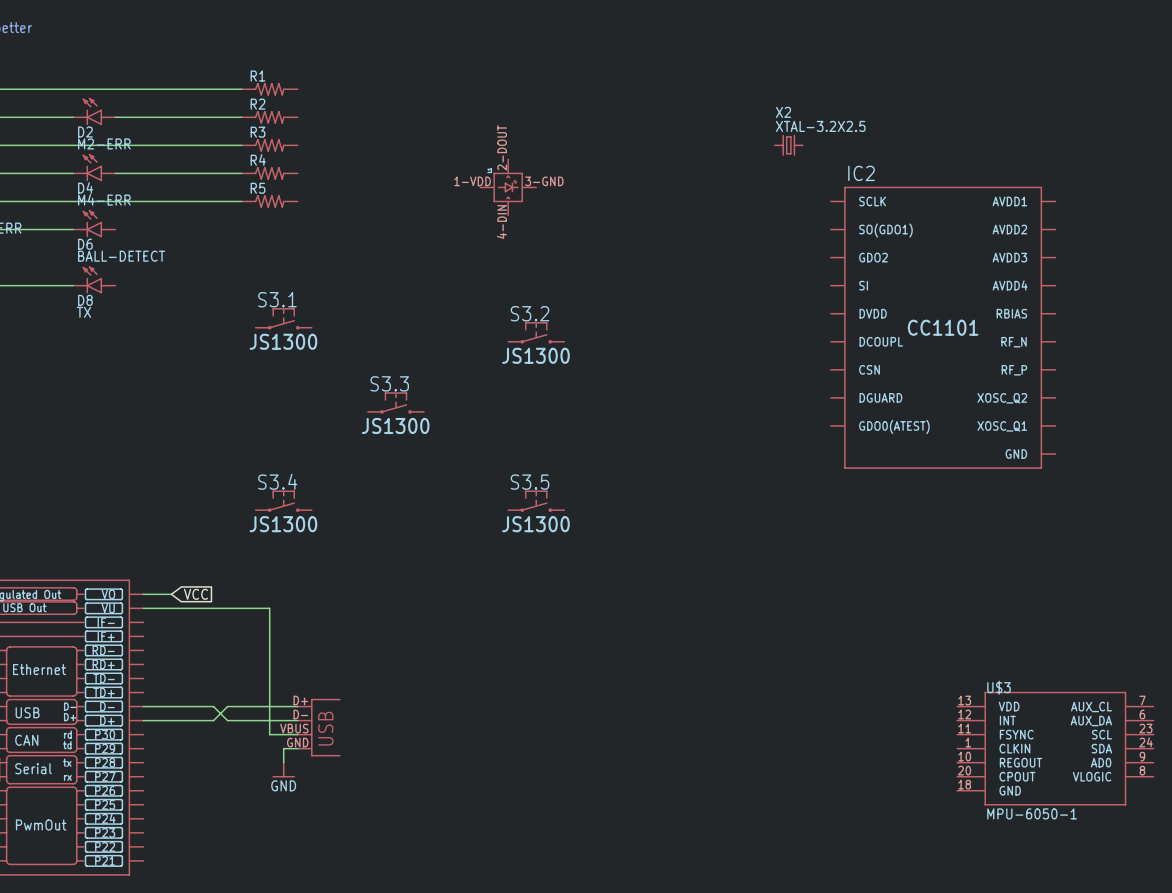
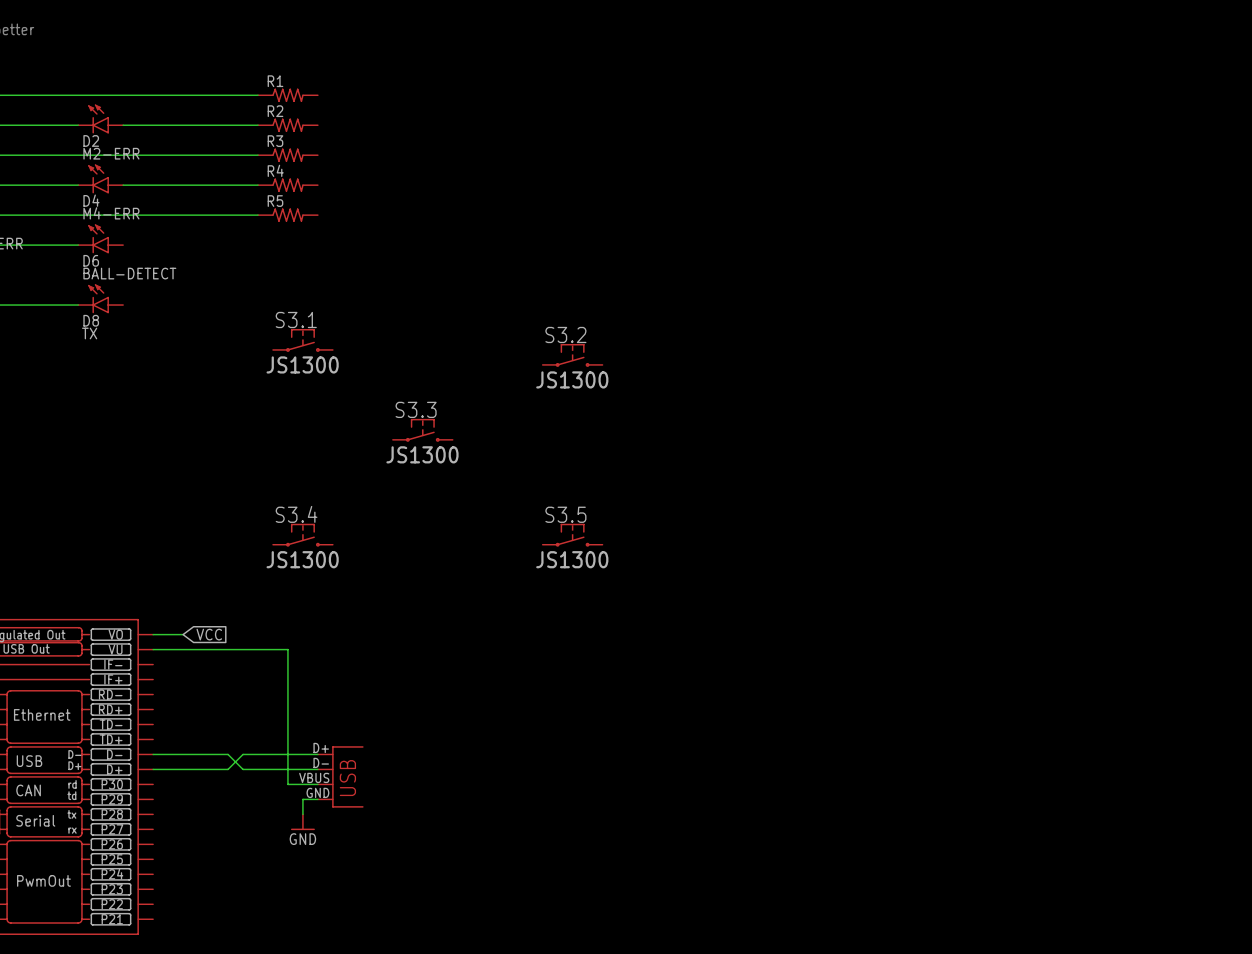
X2: XTAL-3.2X2.5 (788, 145) -> none
part: (508, 187) -> none
IC2: CC1101 (943, 327) -> none
U$3: MPU-6050-1 (1055, 748) -> none

